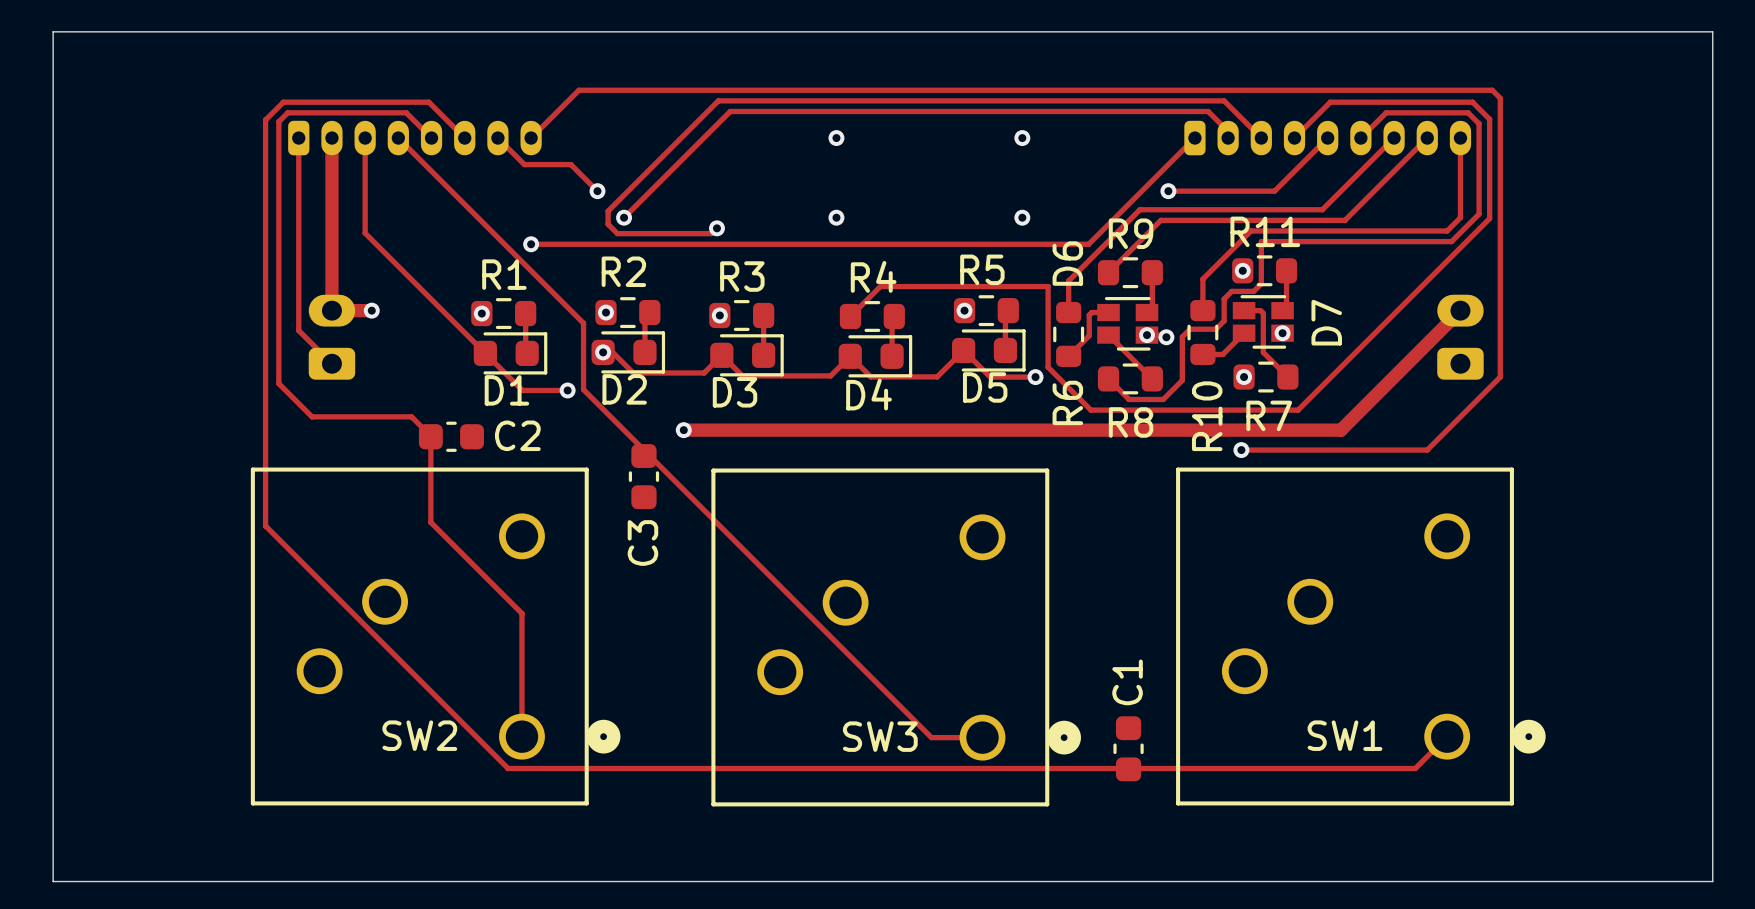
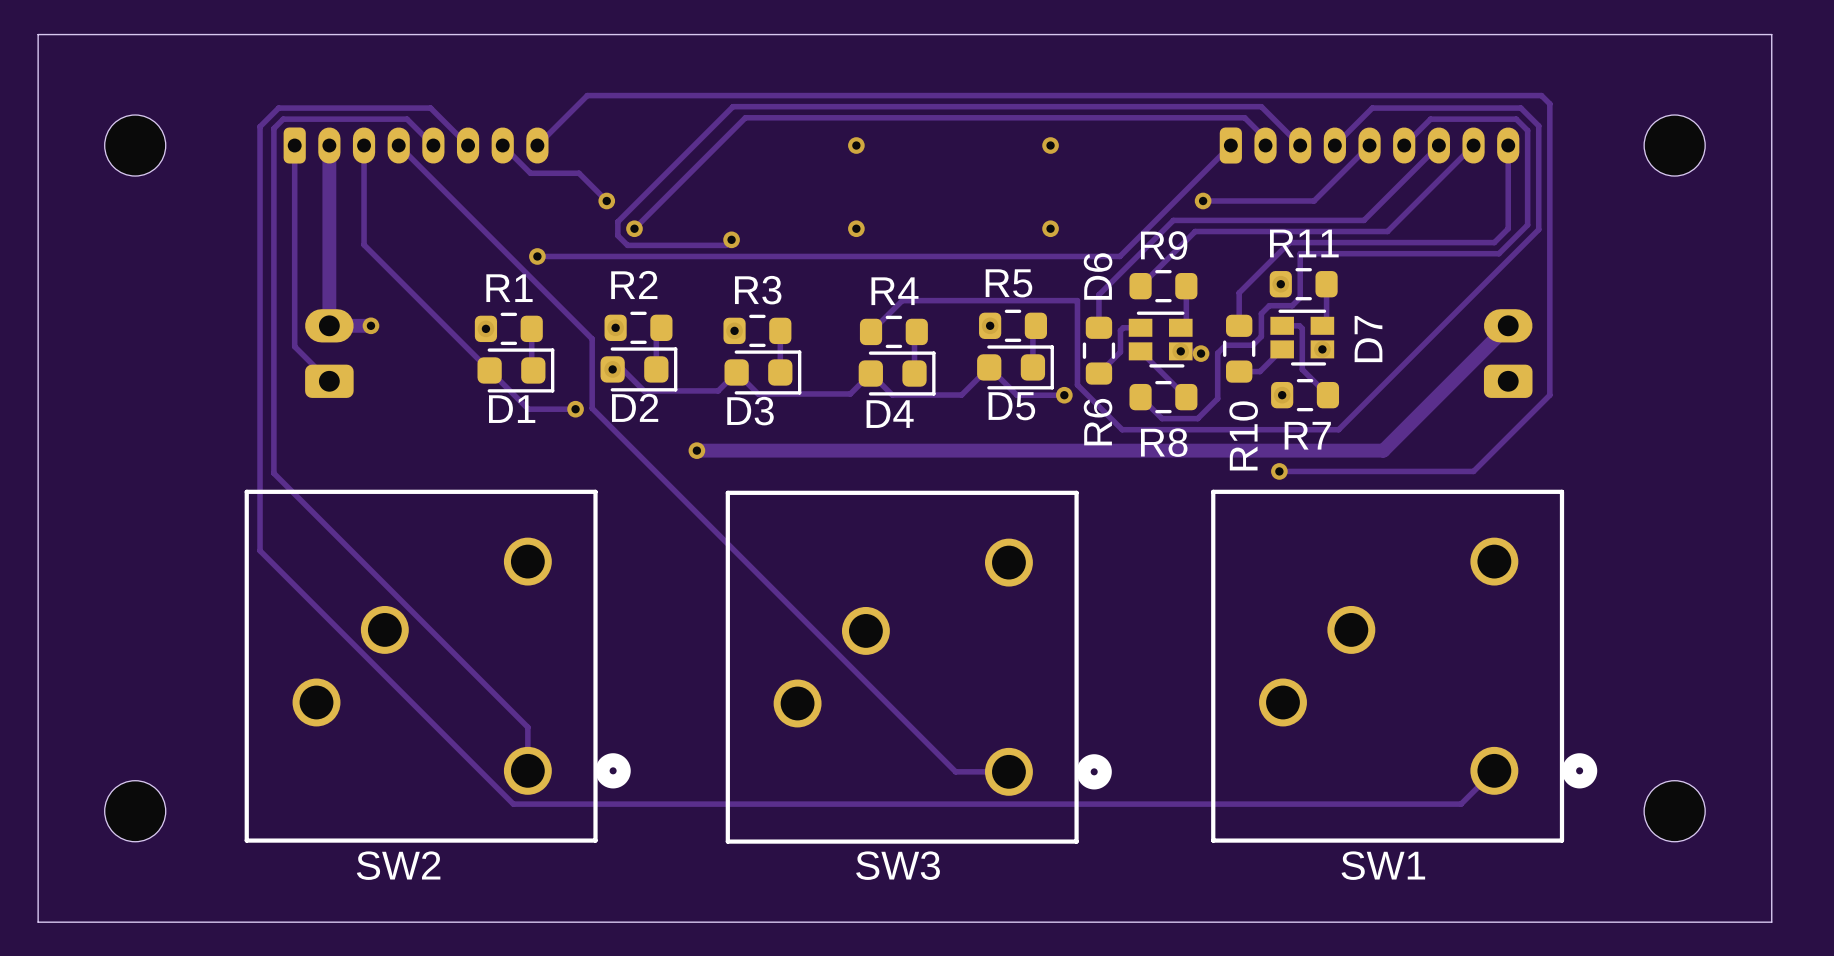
part: none -> (135, 145)
part: none -> (1674, 145)
track: (278, 383) (312, 416) (411, 416) (430, 436) (430, 522) (521, 613) (521, 694) -> (273, 402) (273, 473) (527, 727)
C2: (451, 436) -> none
C3: (643, 476) -> none
SW2 name position: SW2 (419, 735) -> SW2 (398, 865)
SW1 name position: SW1 (1345, 735) -> SW1 (1383, 865)
SW3 name position: SW3 (880, 736) -> SW3 (898, 865)
C1: (1128, 748) -> none
part: none -> (135, 811)
part: none -> (1674, 811)

